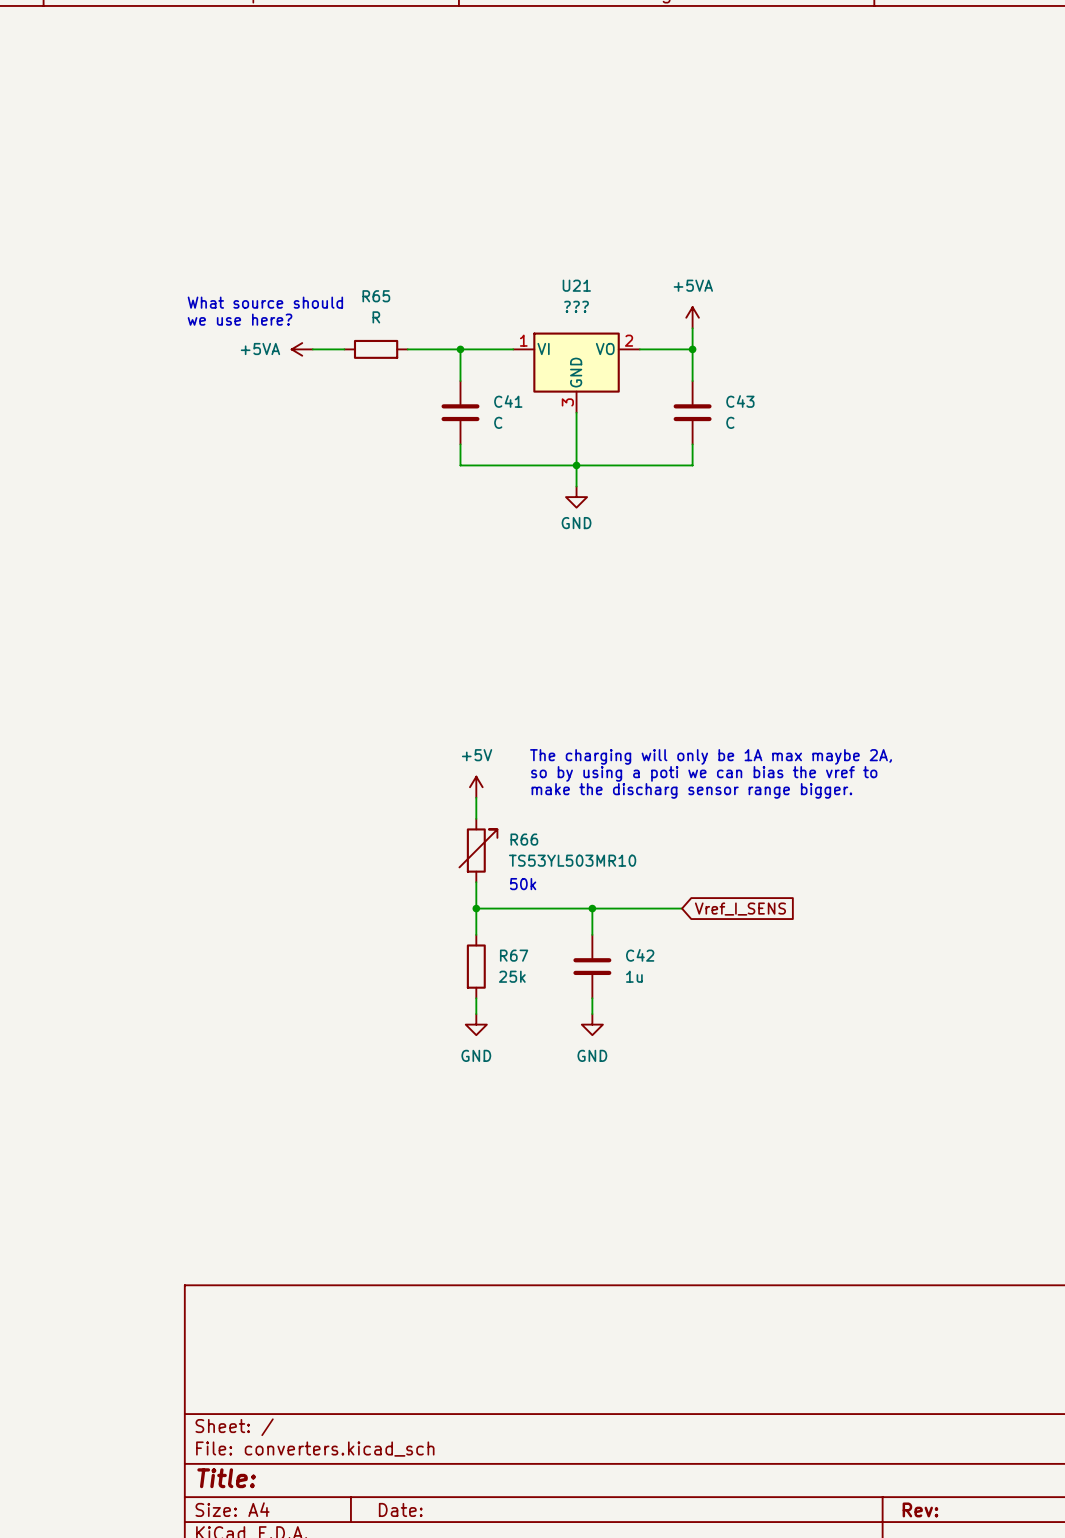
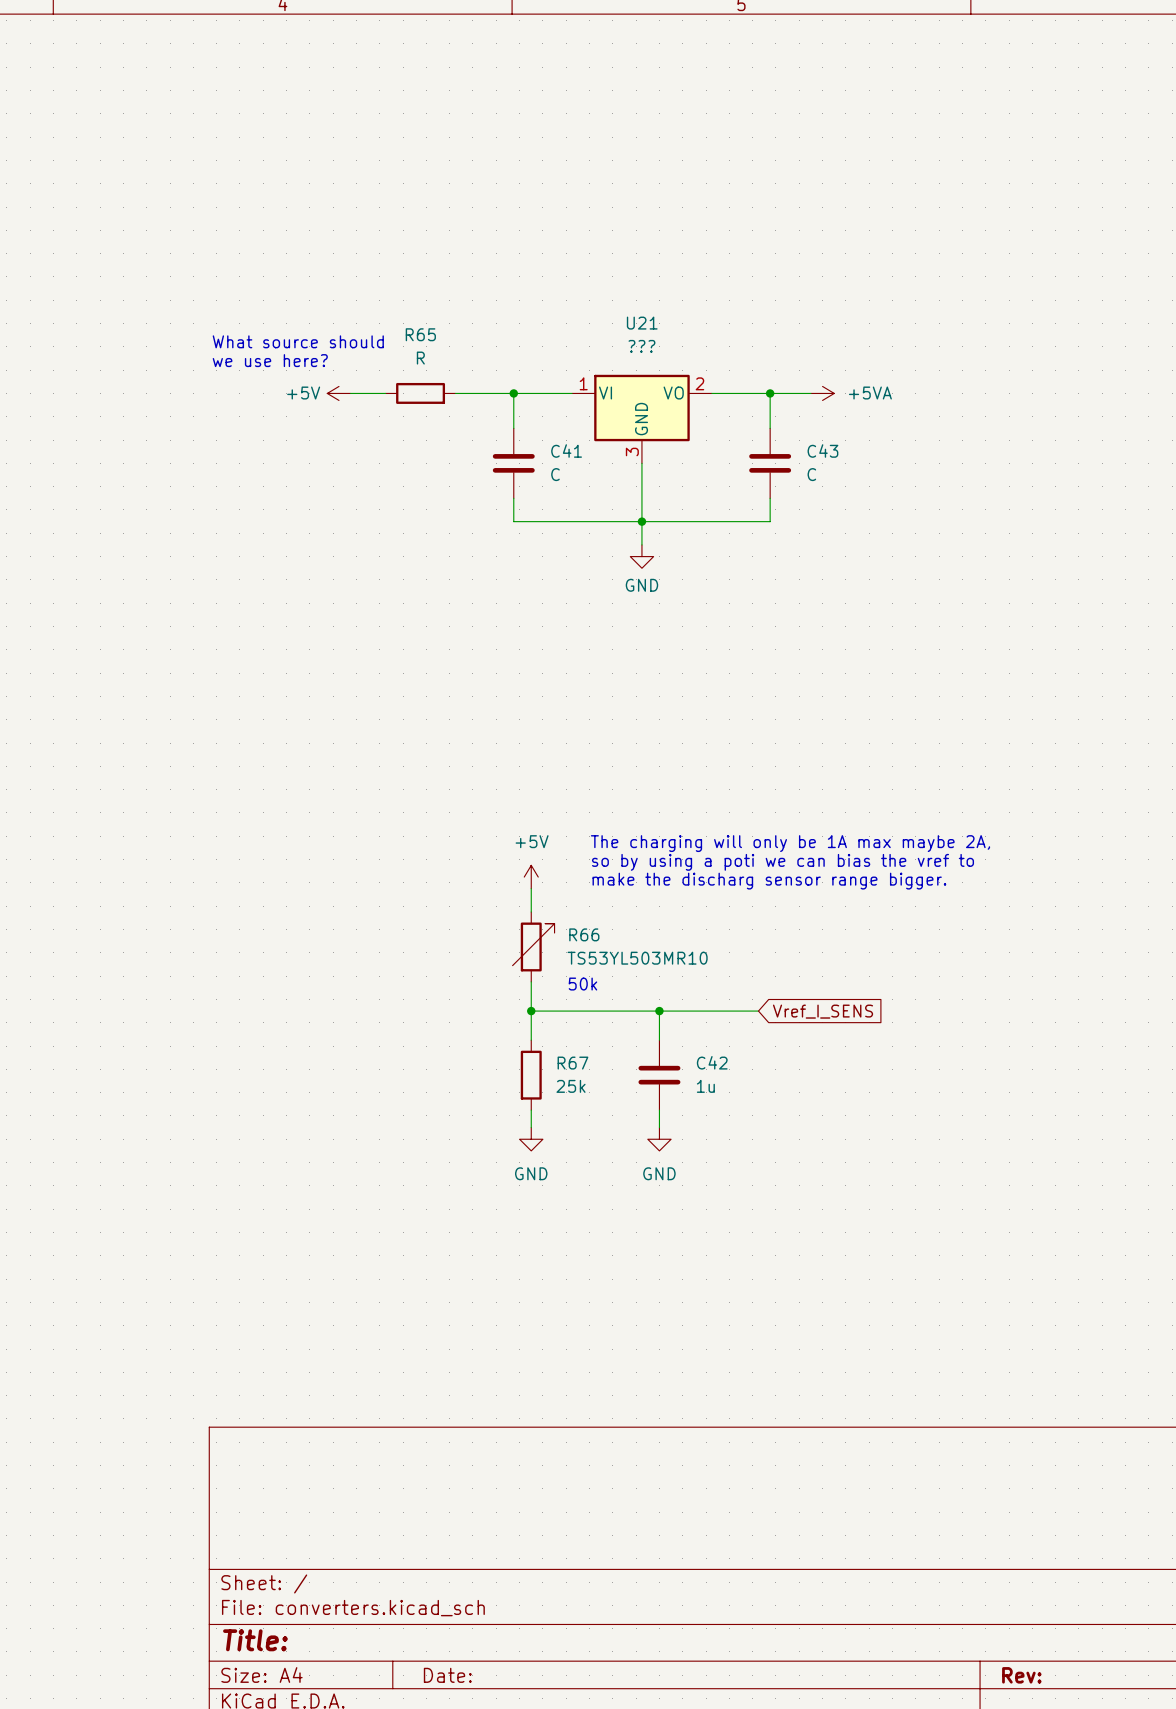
power symbol rotation: 0° (692, 317) -> 90° clockwise (822, 393)
power symbol position: +5VA (692, 317) -> +5VA (822, 393)
wire: (692, 328) (692, 349) -> (810, 393) (770, 393)
power symbol: +5VA (302, 349) -> +5V (338, 393)

